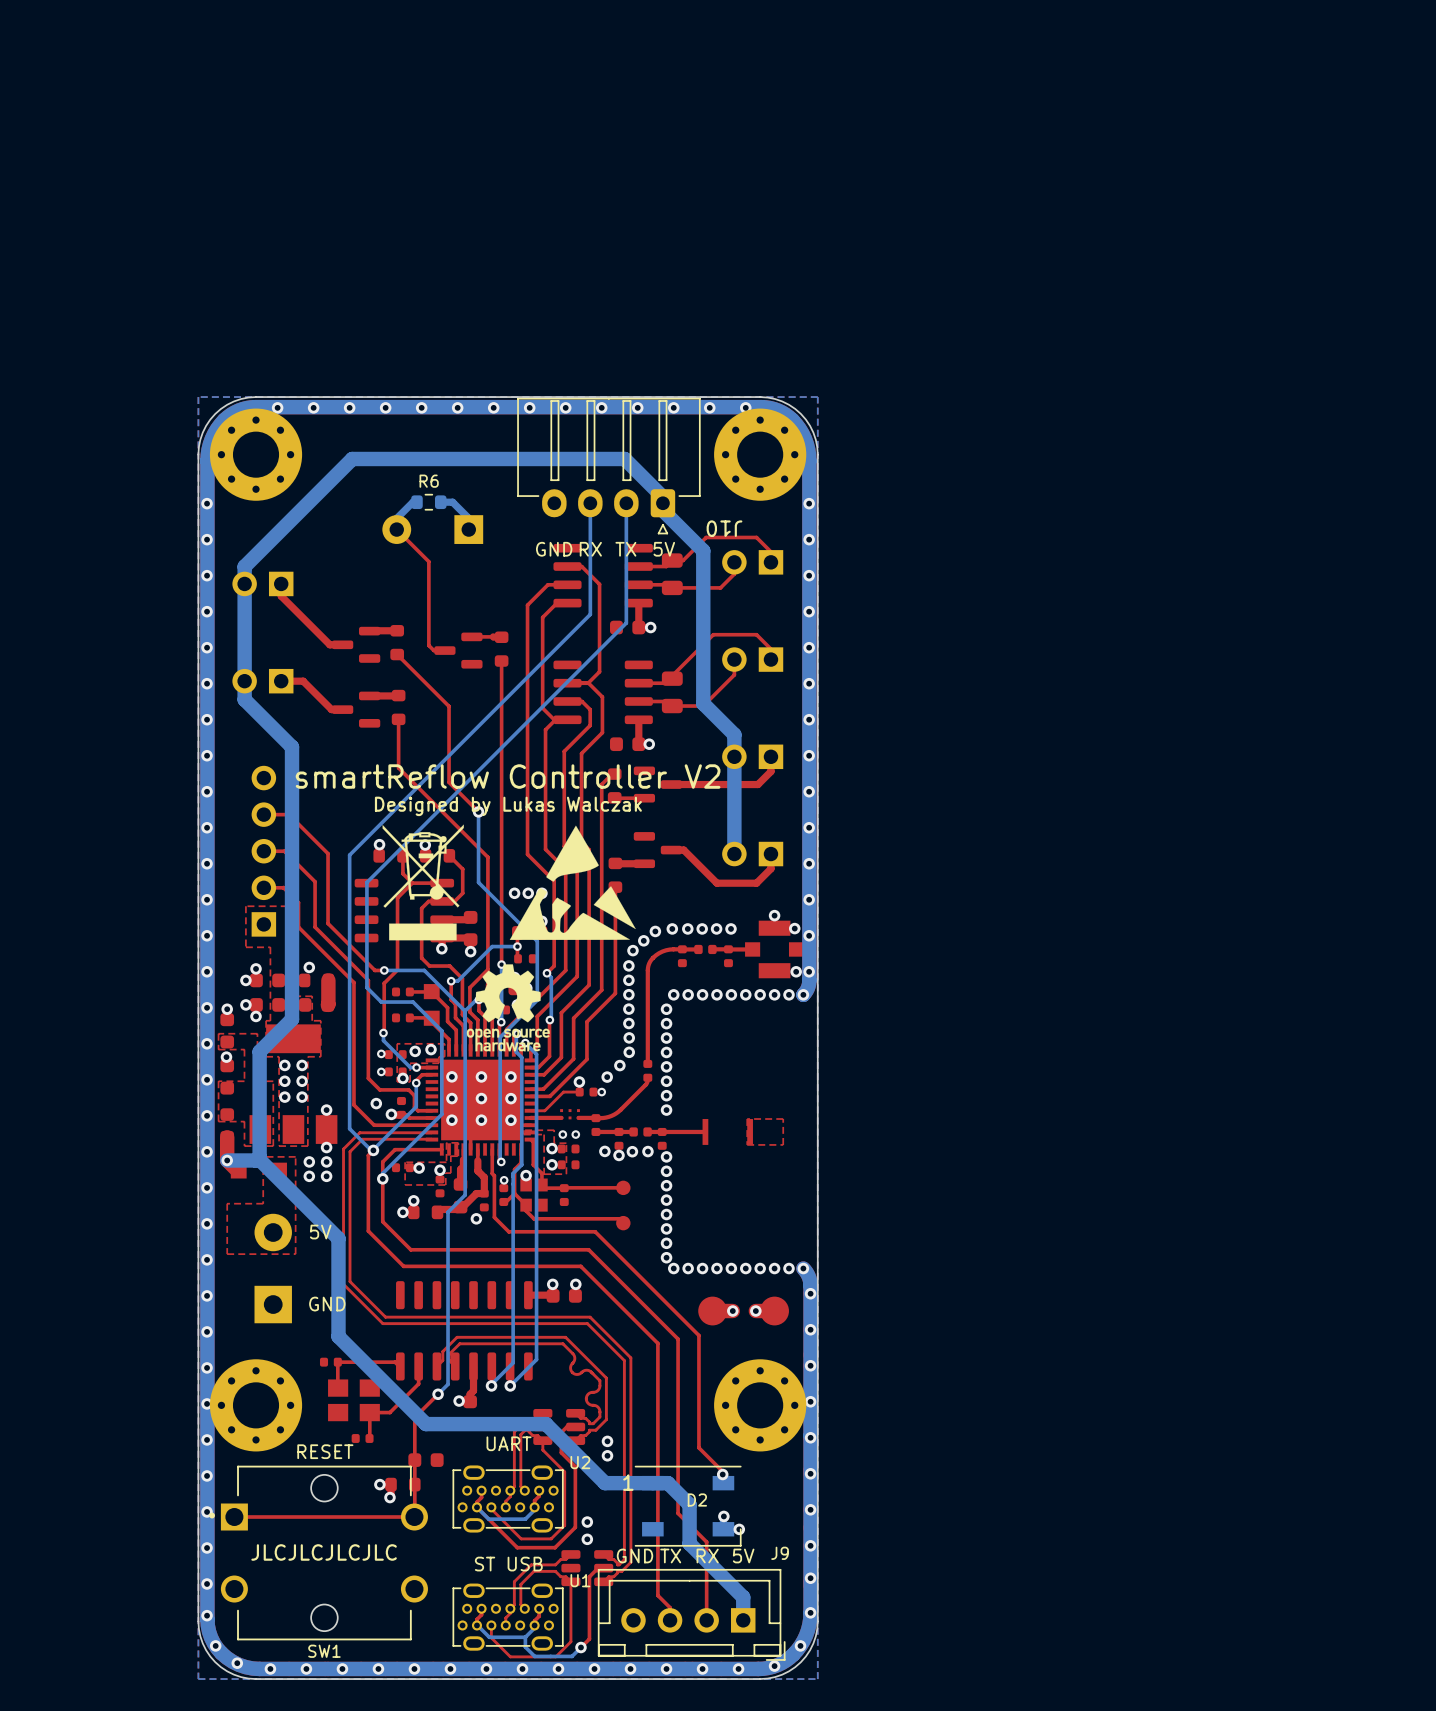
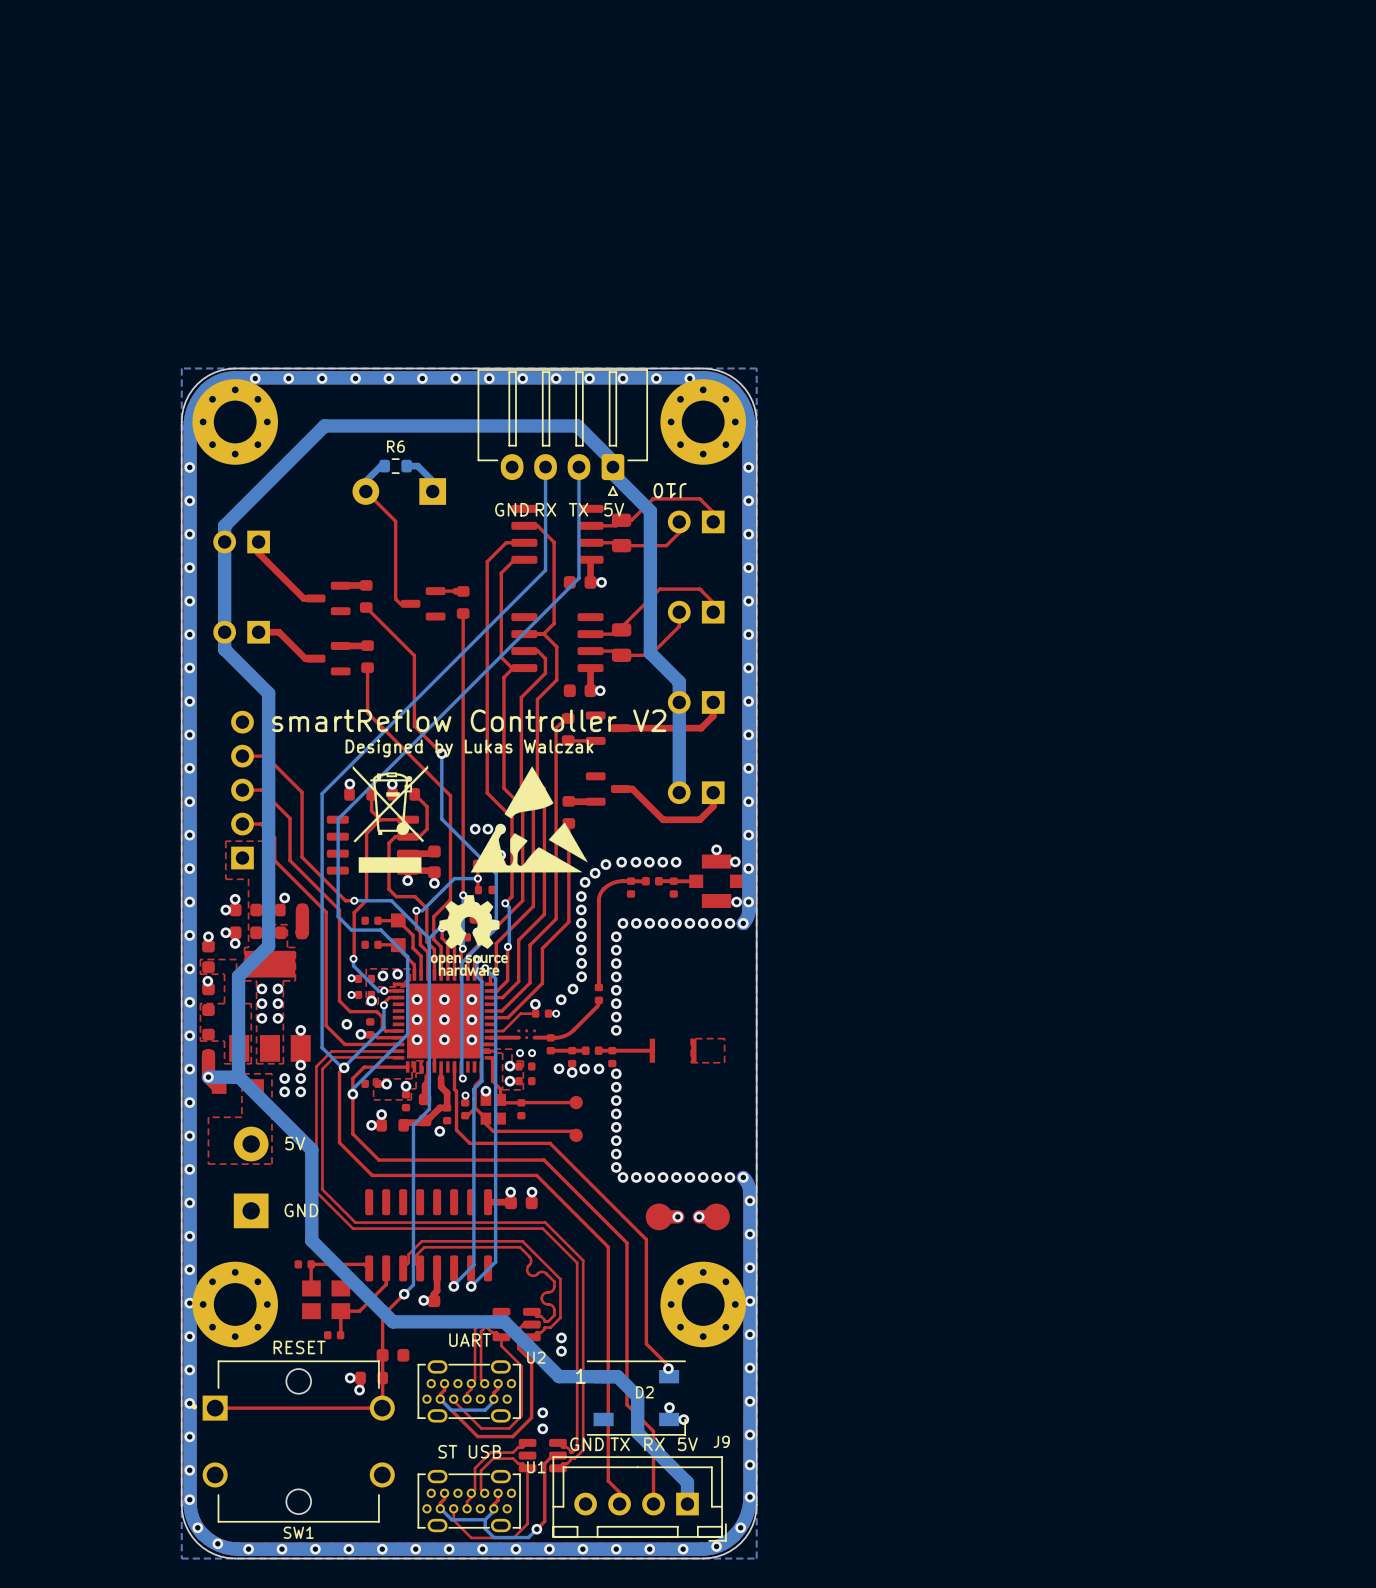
text: JLCJLCJLCJLC (324, 1552) -> none

